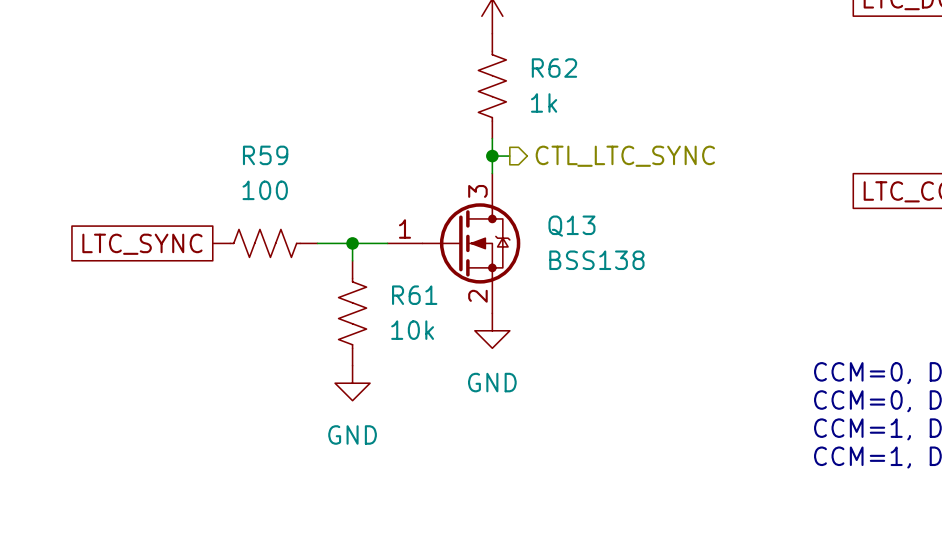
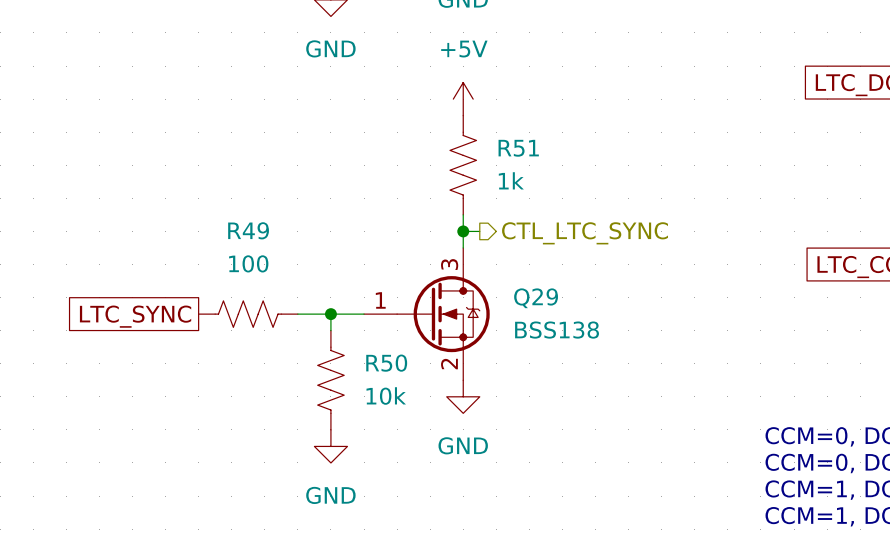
R62 name: R62 (554, 68) -> R51 (518, 148)
R59 name: R59 (265, 155) -> R49 (248, 230)
Q13 name: Q13 (571, 226) -> Q29 (536, 298)
R61 name: R61 (414, 295) -> R50 (386, 363)

